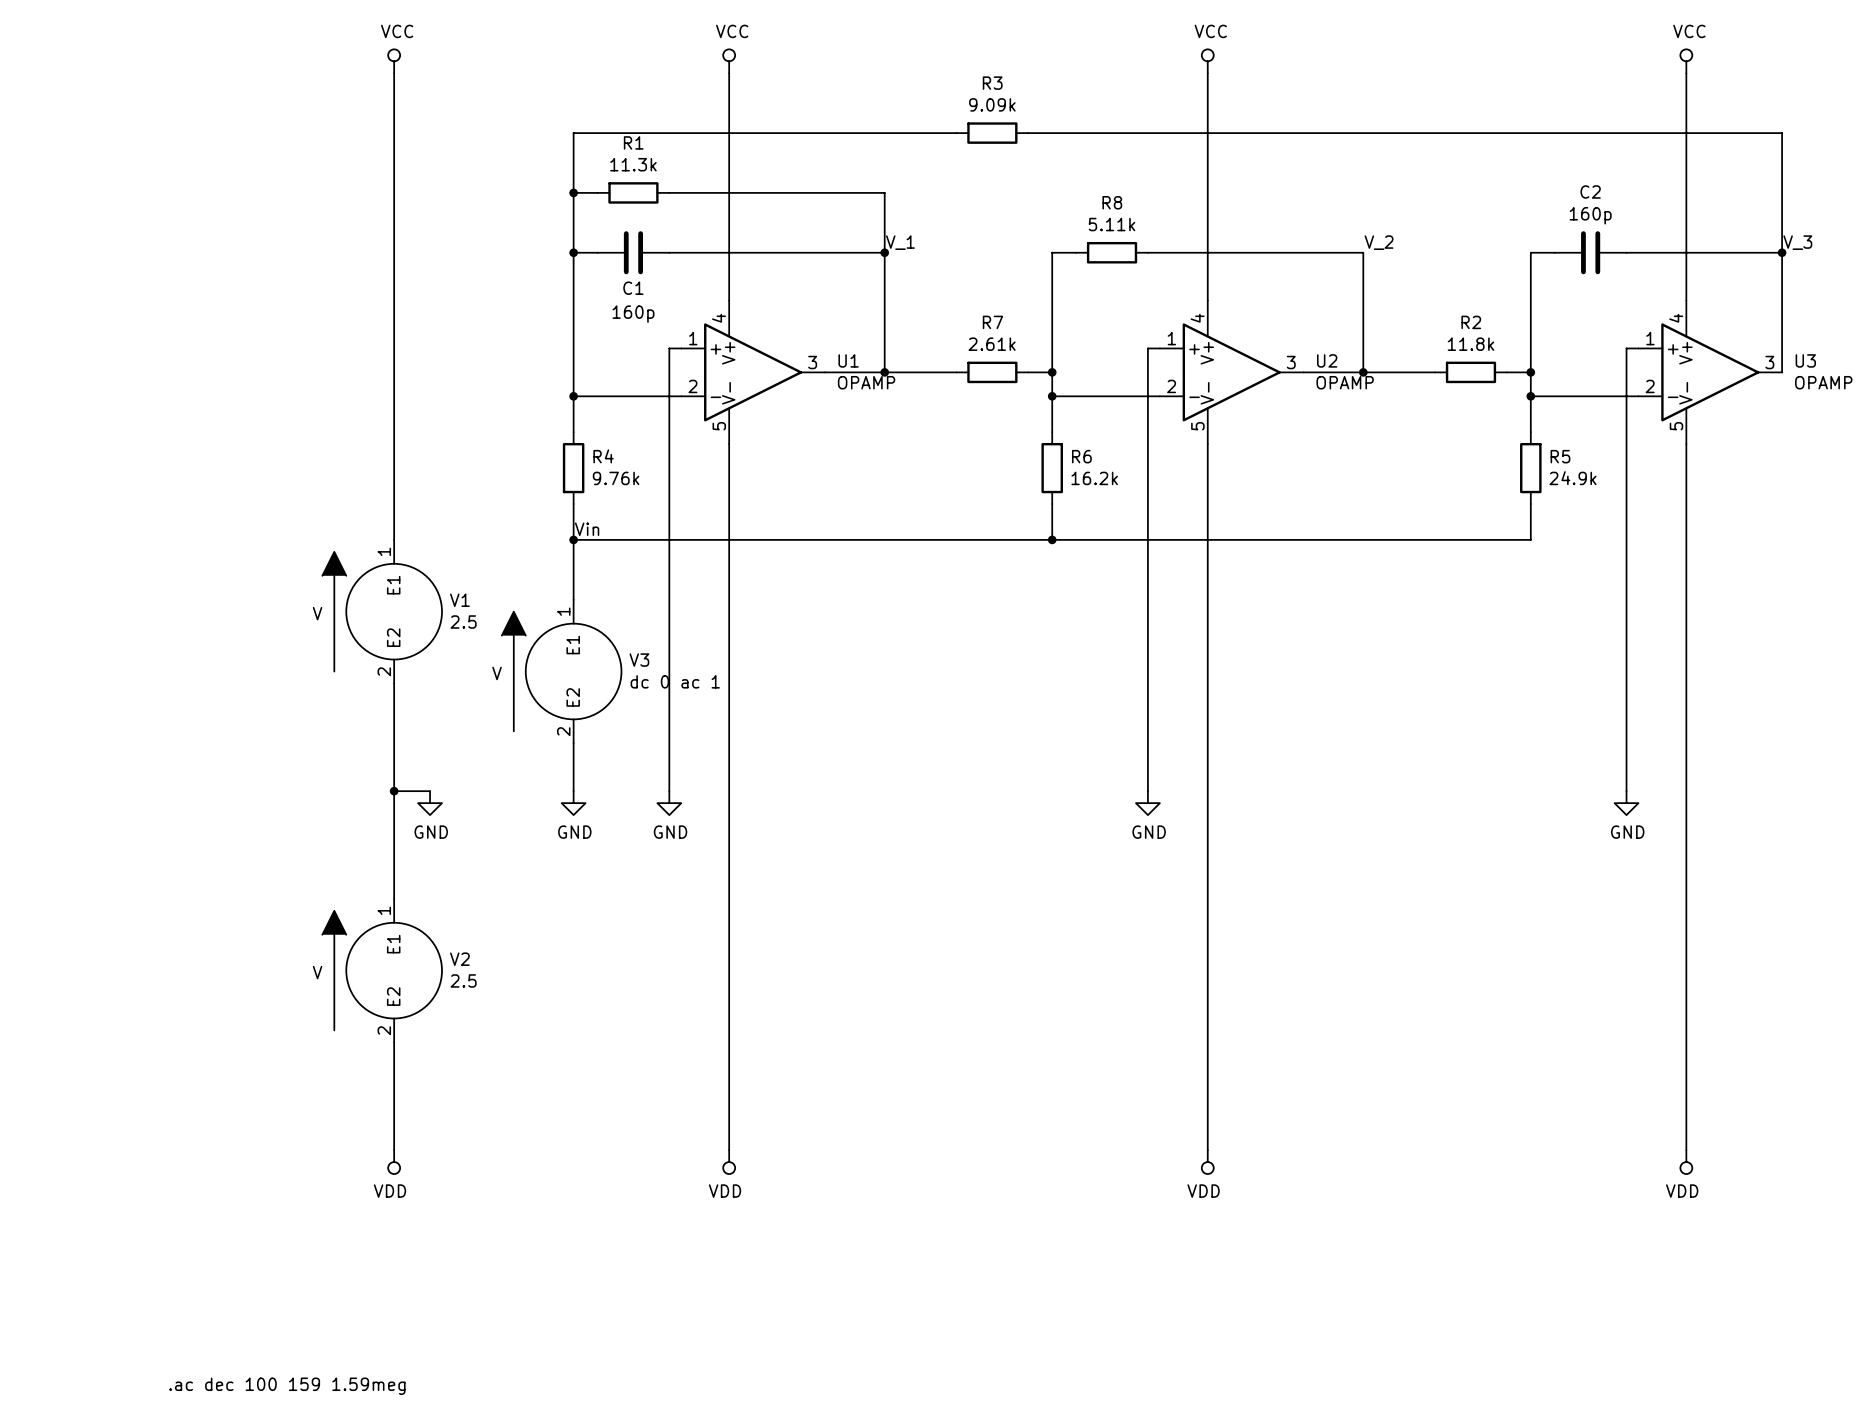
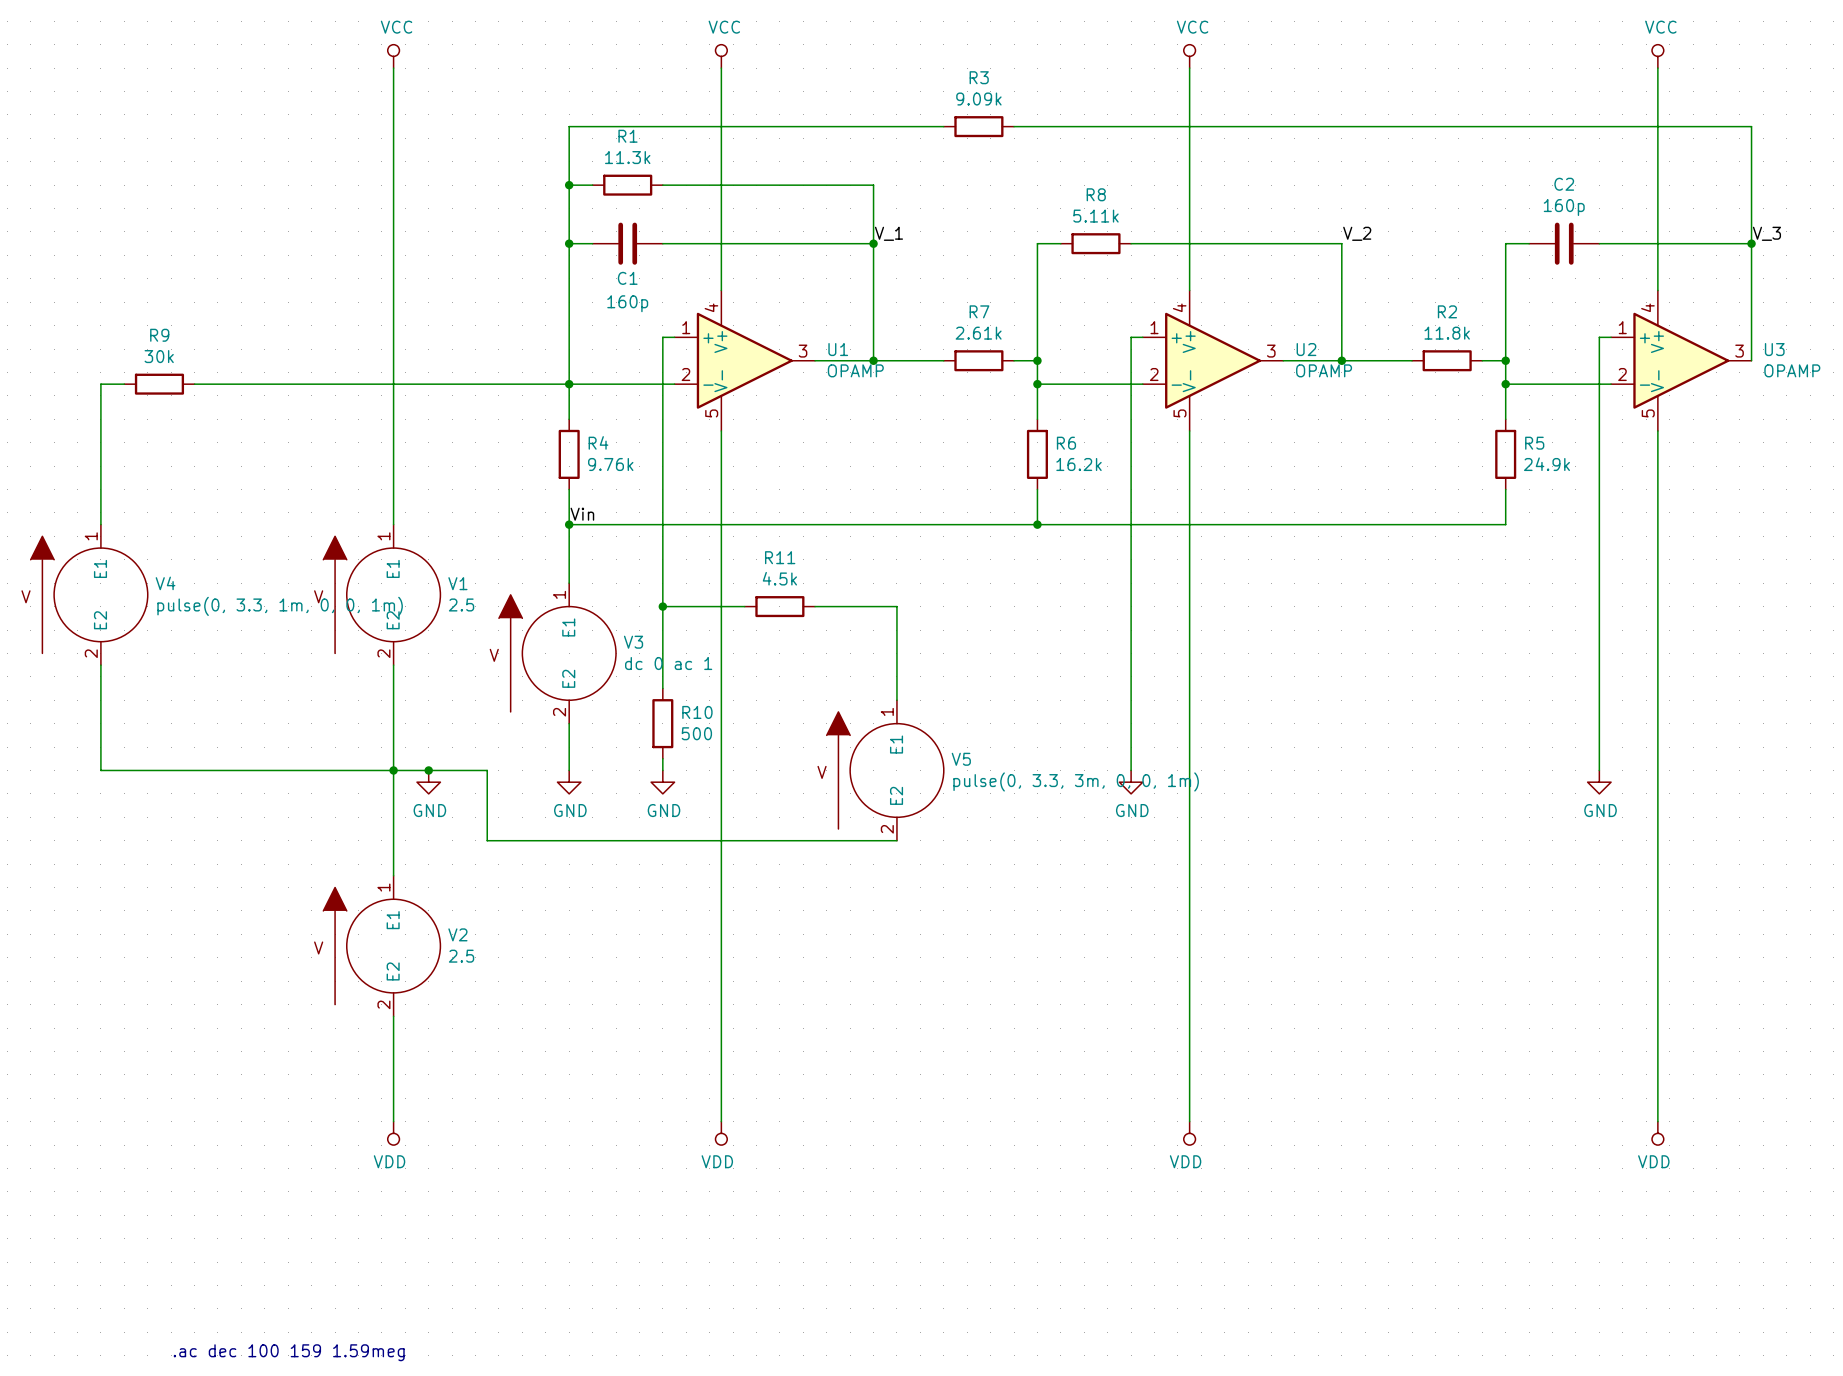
wire: none -> (124, 384) (100, 384) (100, 524)
R9: none -> 30k (159, 384)
wire: none -> (194, 384) (569, 384)
V4: none -> pulse(0, 3.3, 1m, 0, 0, 1m) (89, 594)
wire: none -> (662, 606) (744, 606)
junction: none -> (662, 606)
R11: none -> 4.5k (779, 606)
wire: none -> (815, 606) (896, 606) (896, 700)
wire: none -> (100, 665) (100, 770) (393, 770)
wire: (669, 707) (669, 779) -> none
R10: none -> 500 (662, 723)
wire: none -> (428, 770) (487, 770) (487, 840) (896, 840)
junction: none -> (428, 770)
V5: none -> pulse(0, 3.3, 3m, 0, 0, 1m) (885, 770)

